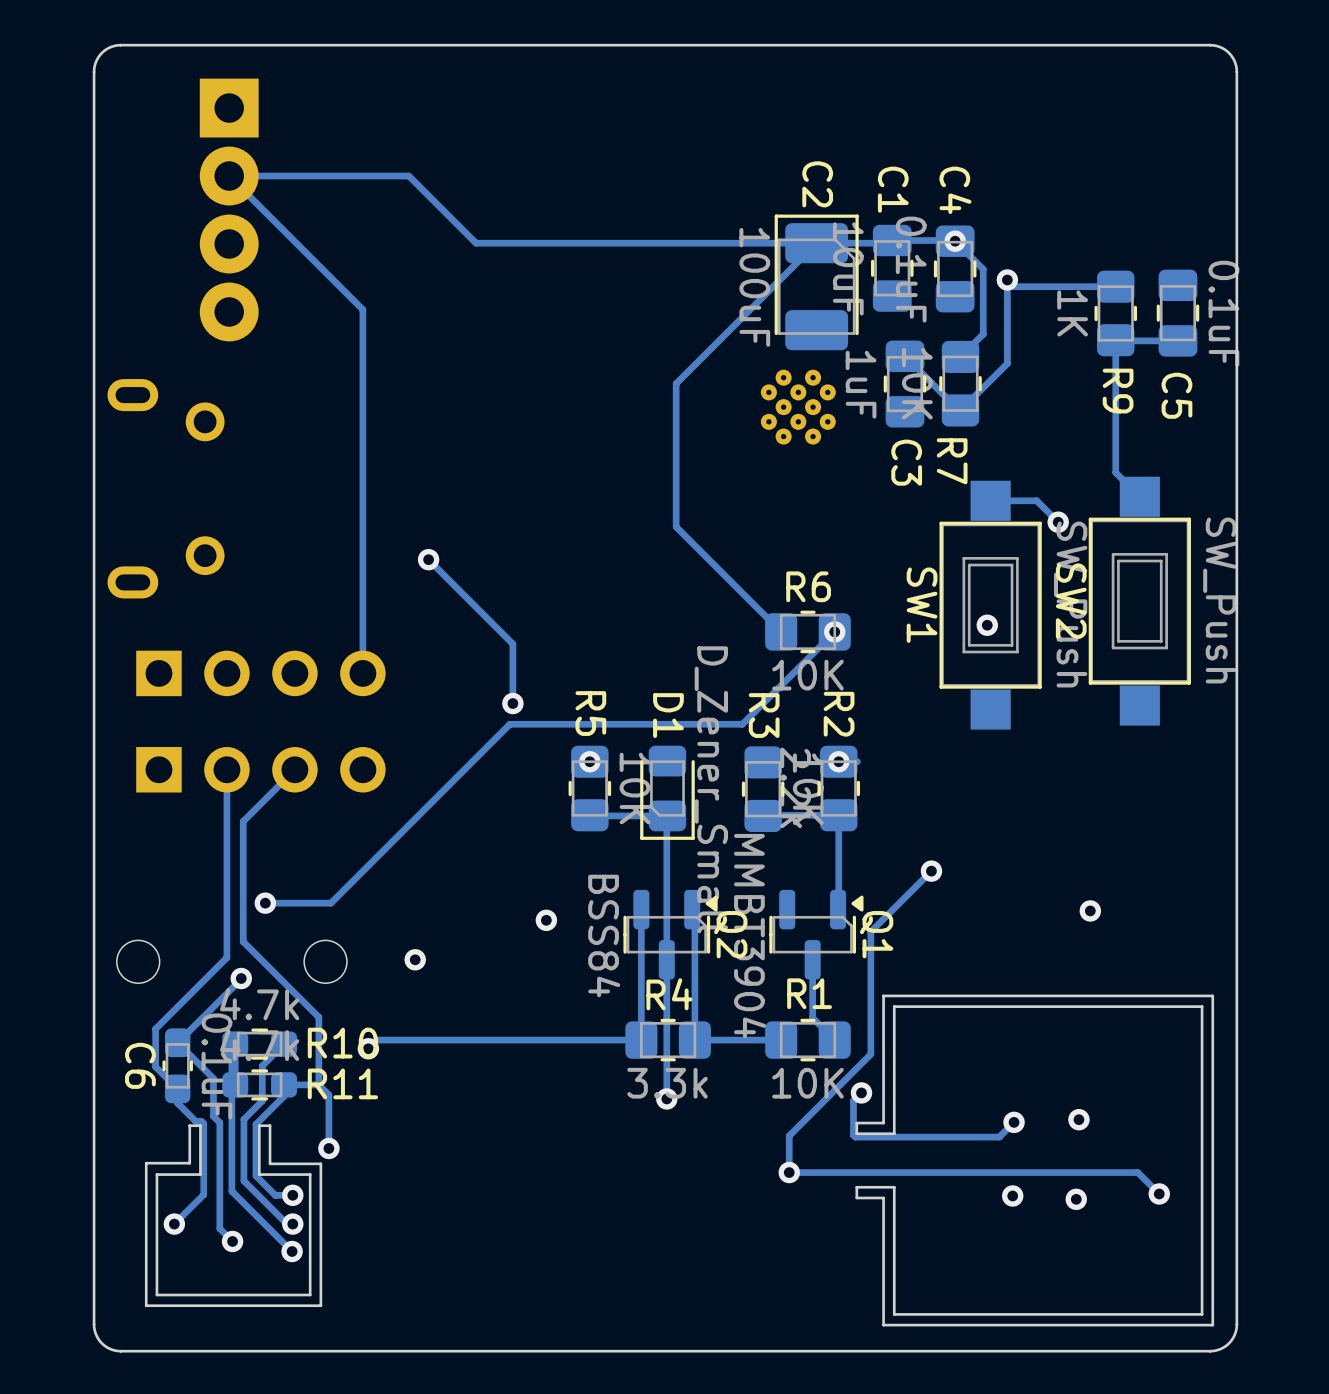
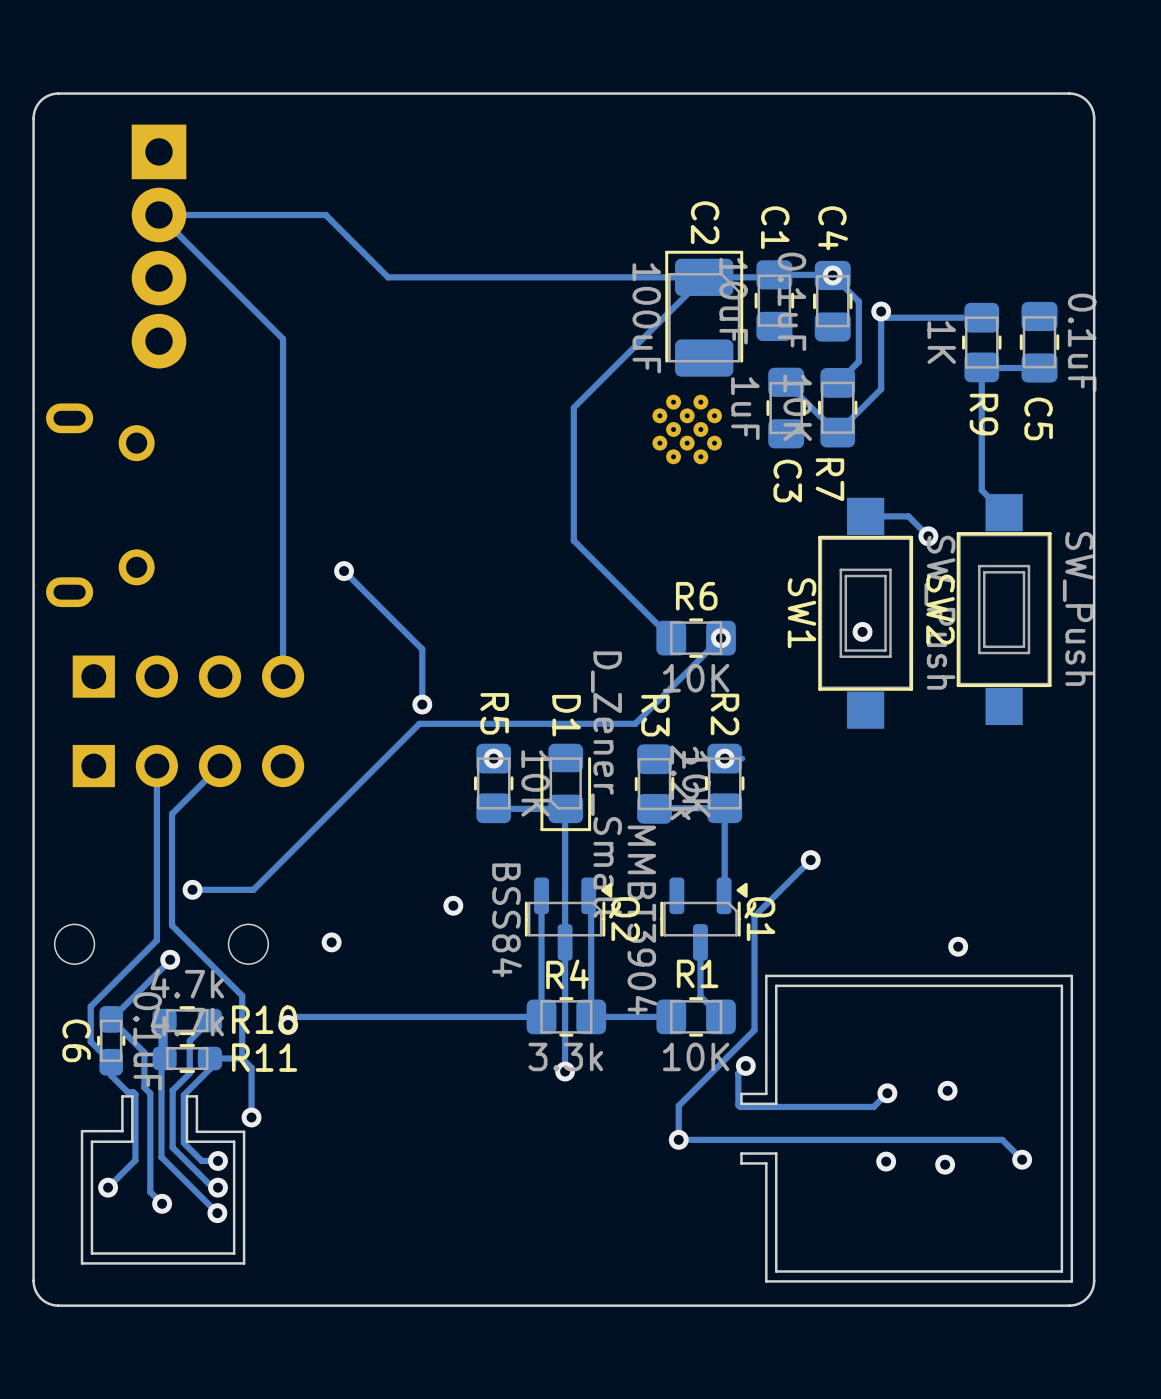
via position: (1090, 910) -> (958, 946)

